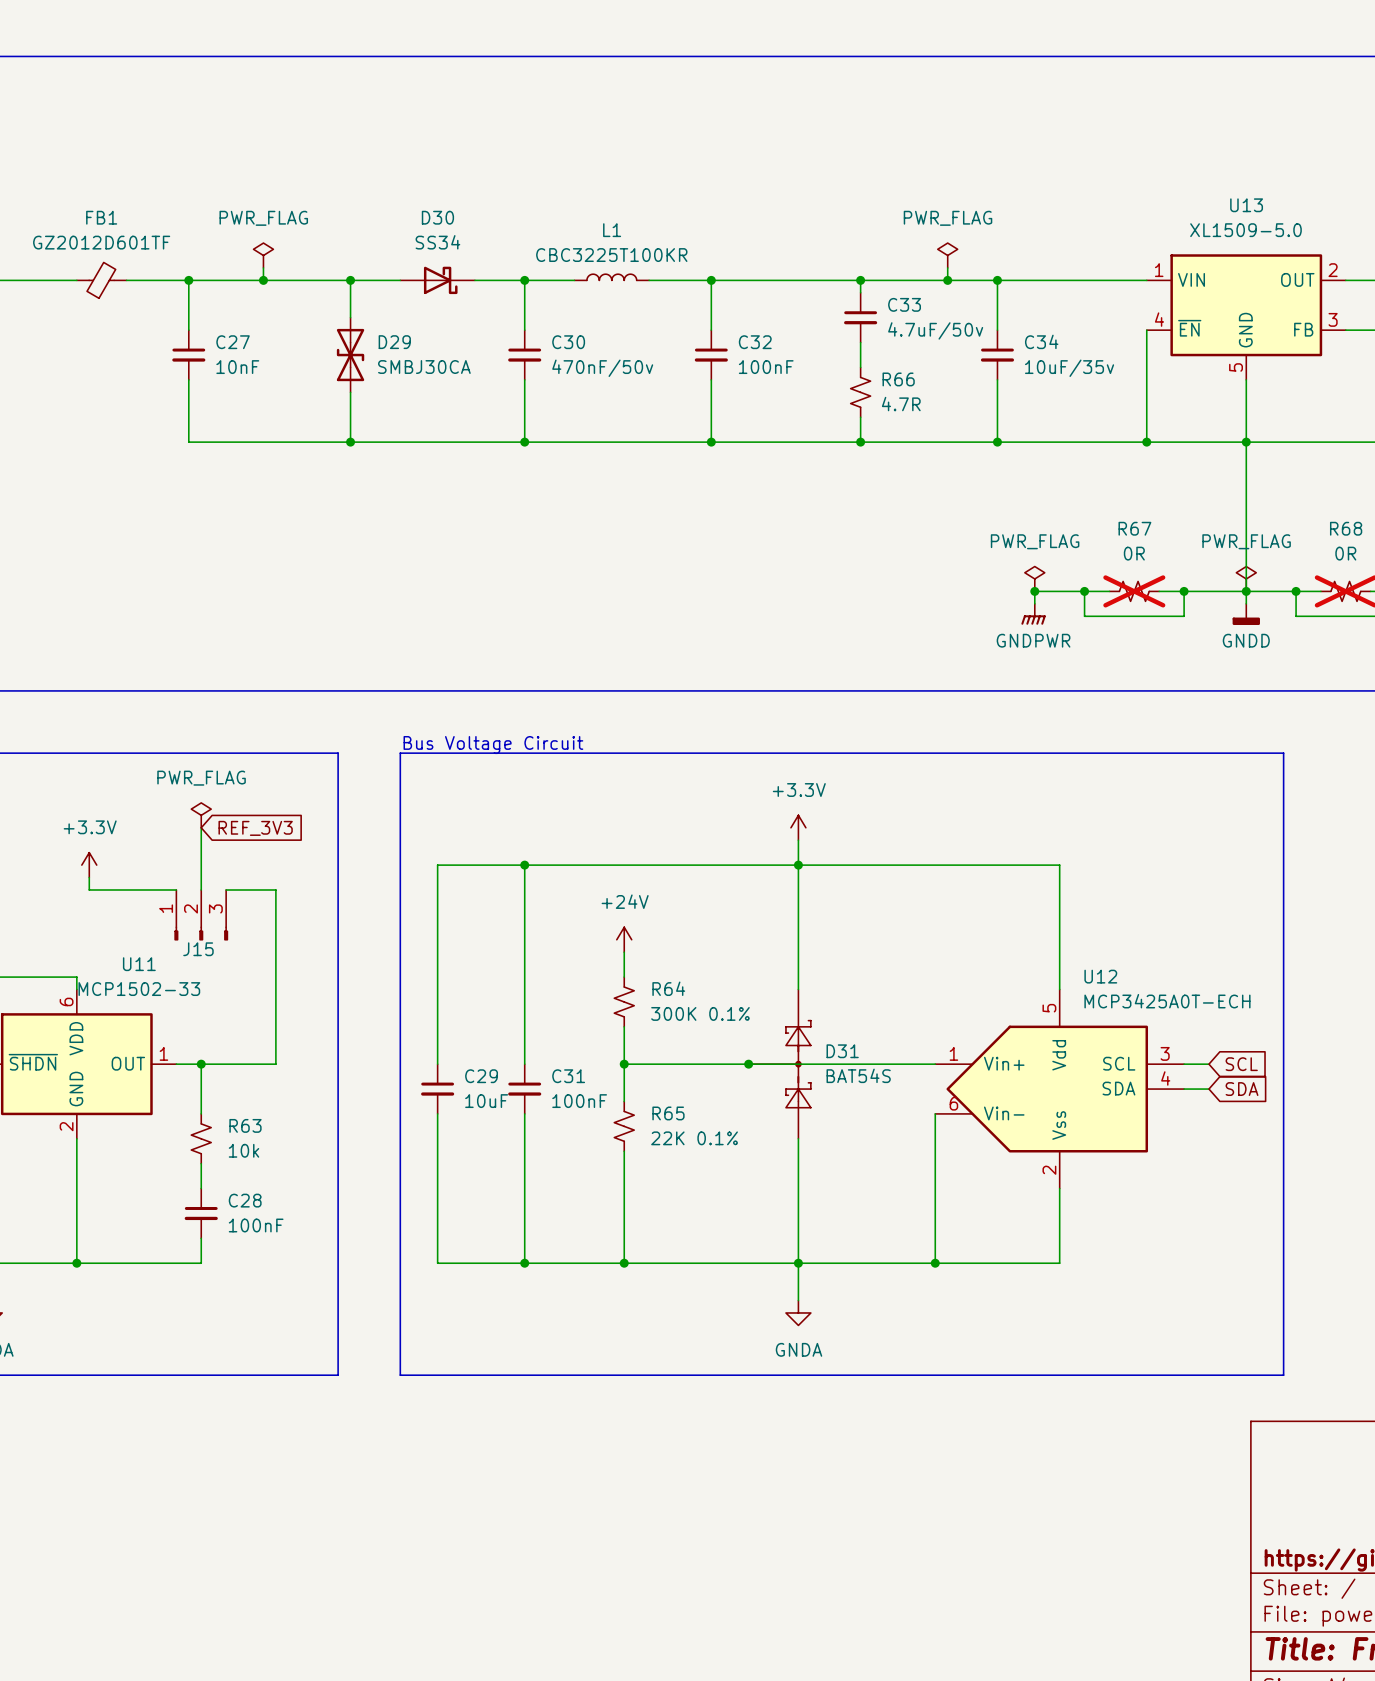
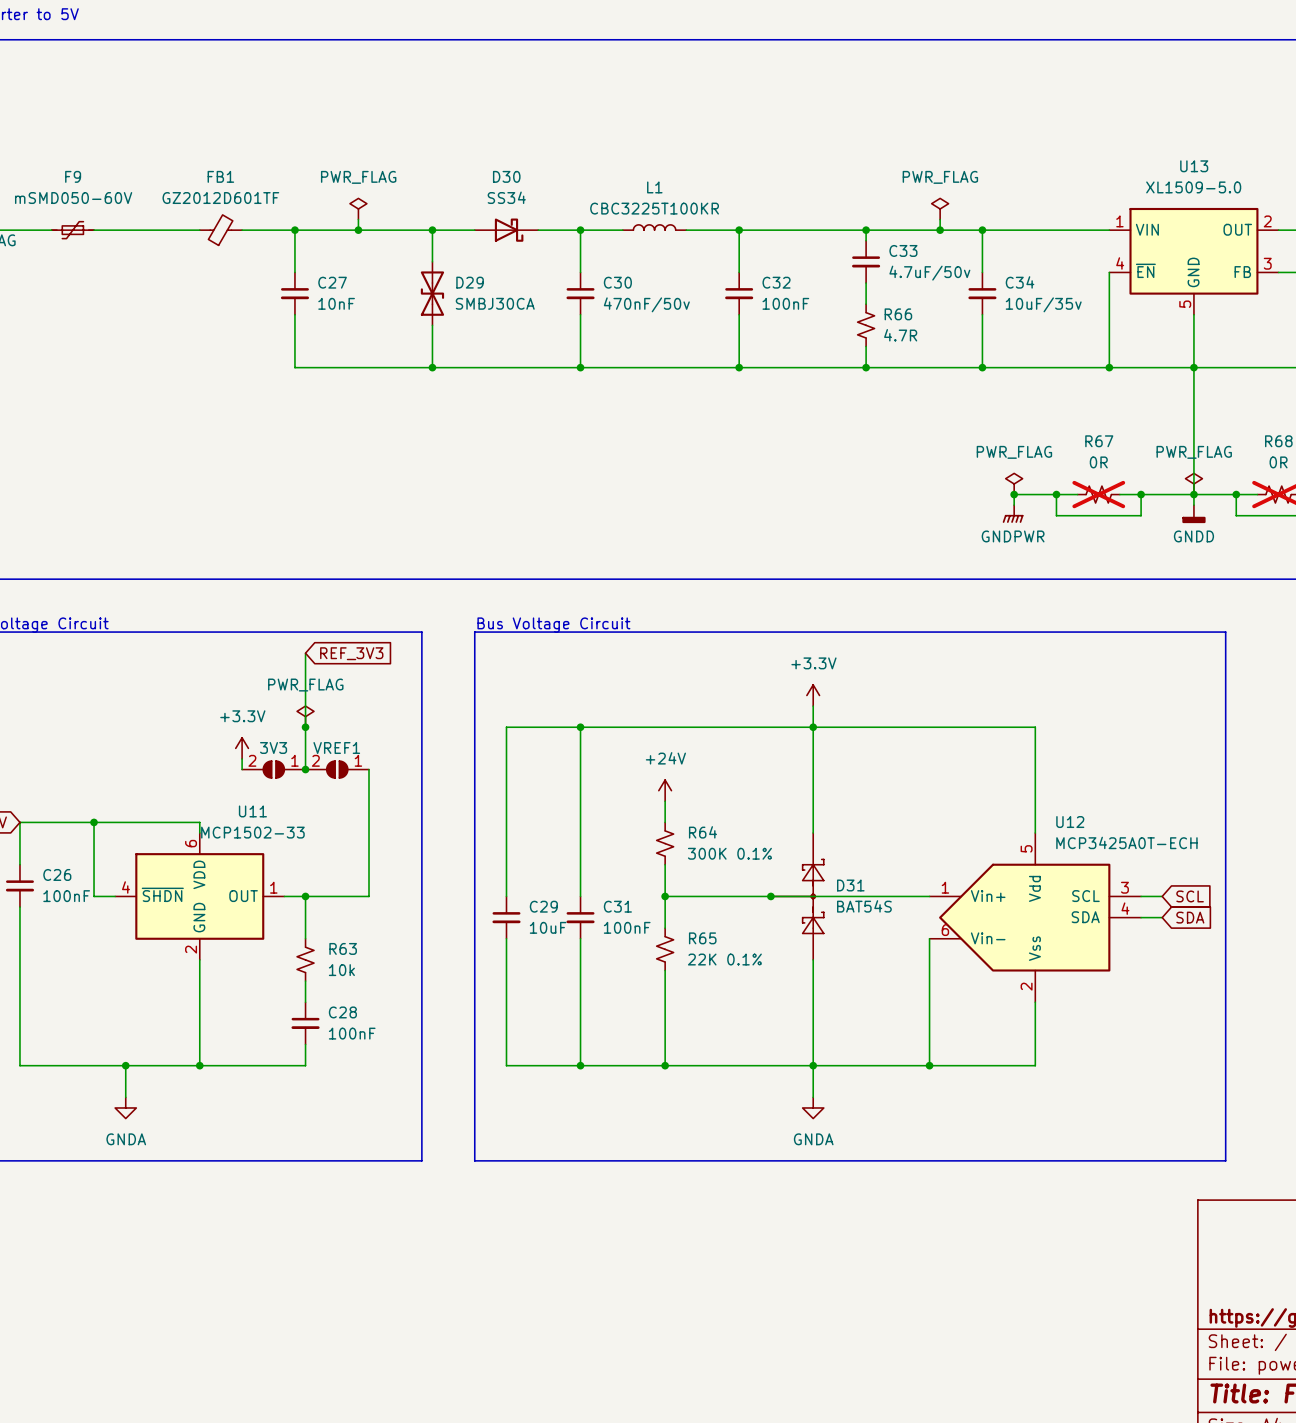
wire: none -> (305, 653) (305, 695)
power symbol position: PWR_FLAG (201, 815) -> PWR_FLAG (305, 716)
global label position: REF_3V3 (255, 828) -> REF_3V3 (351, 653)
power symbol position: +3.3V (89, 865) -> +3.3V (242, 748)
junction: none -> (305, 727)
wire: (89, 877) (89, 889) (176, 889) -> none
wire: (226, 889) (275, 889) (275, 914) -> none
wire: none -> (242, 758) (242, 769)
3V3: none -> (273, 769)
junction: none -> (305, 769)
VREF1: none -> (337, 769)
J15: (201, 915) -> none

